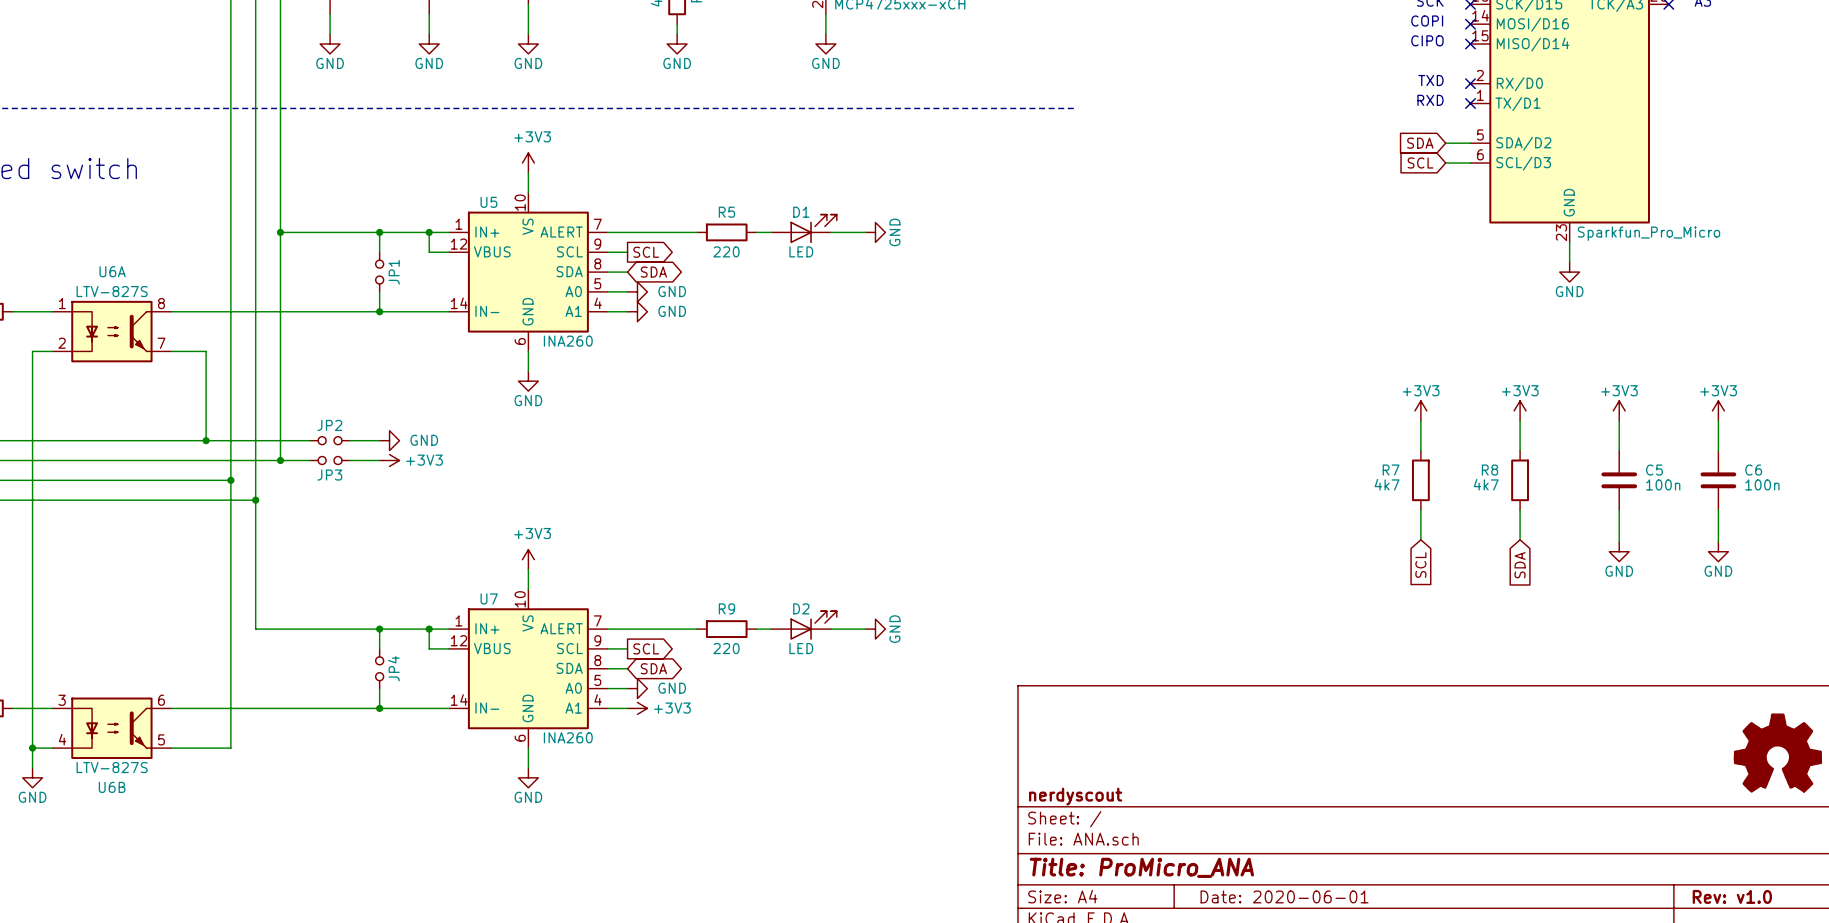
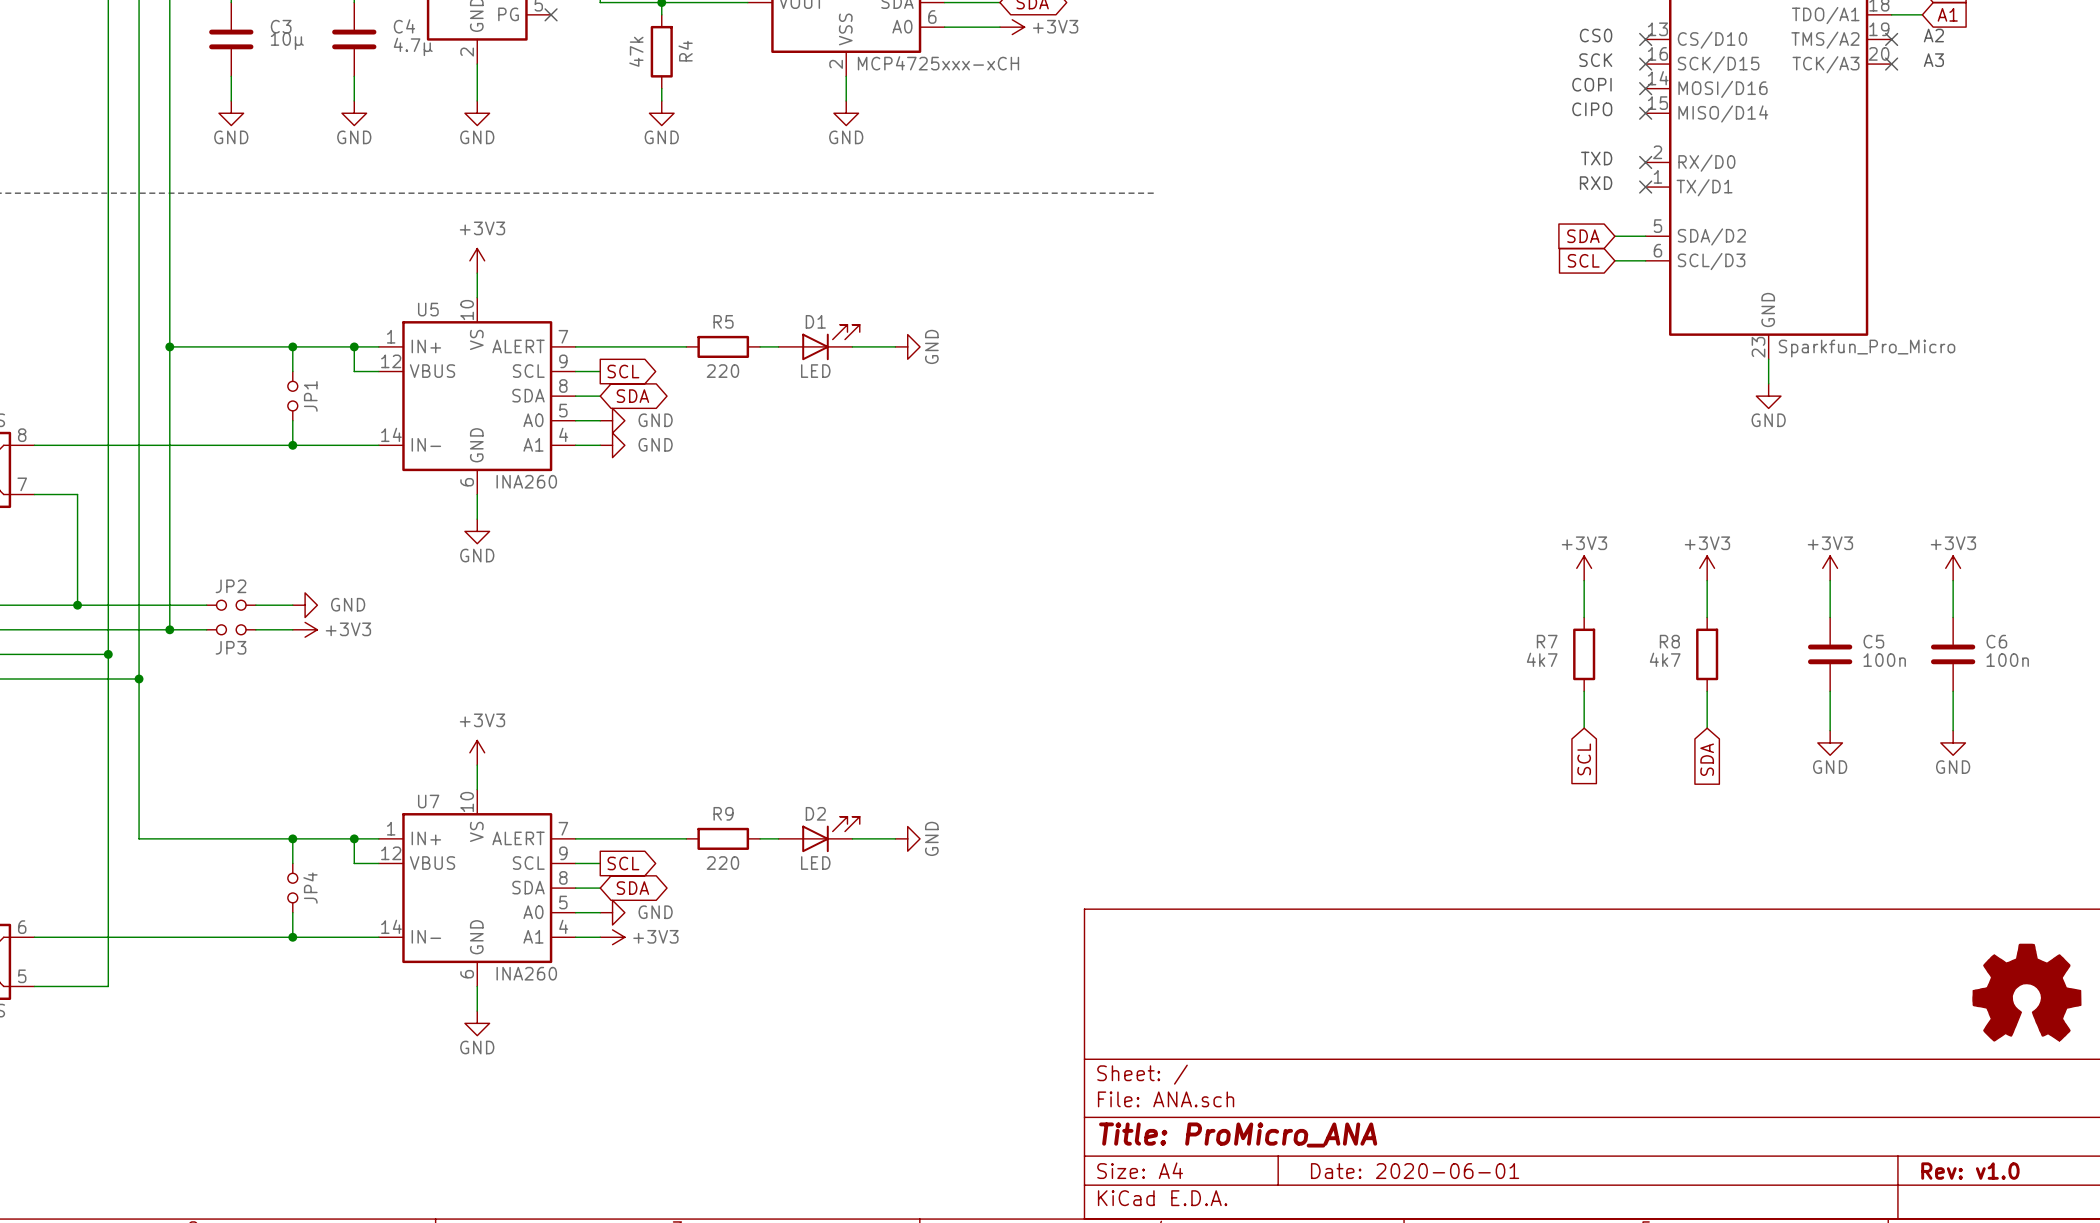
title block: nerdyscout (1075, 796) -> none

